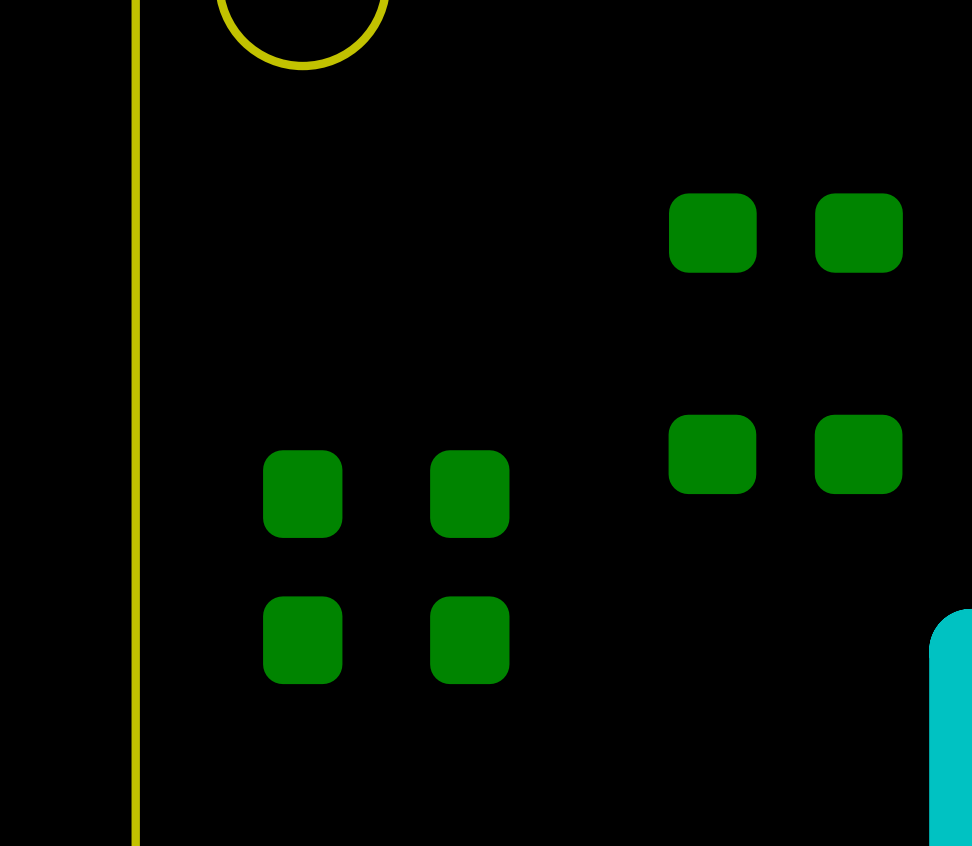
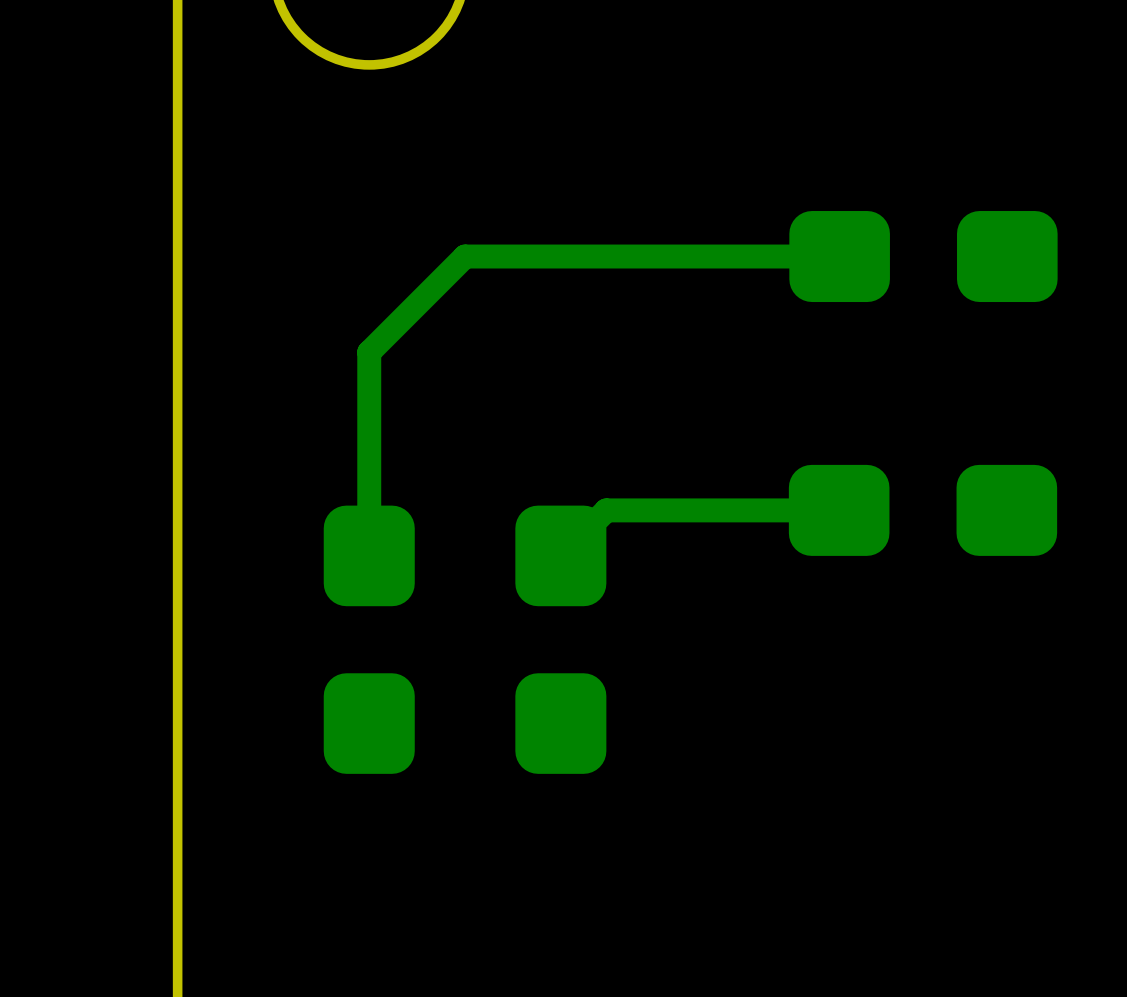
bottom track: none -> (839, 256) (465, 256) (369, 352) (369, 555)
bottom track: none -> (839, 510) (606, 510) (560, 555)

